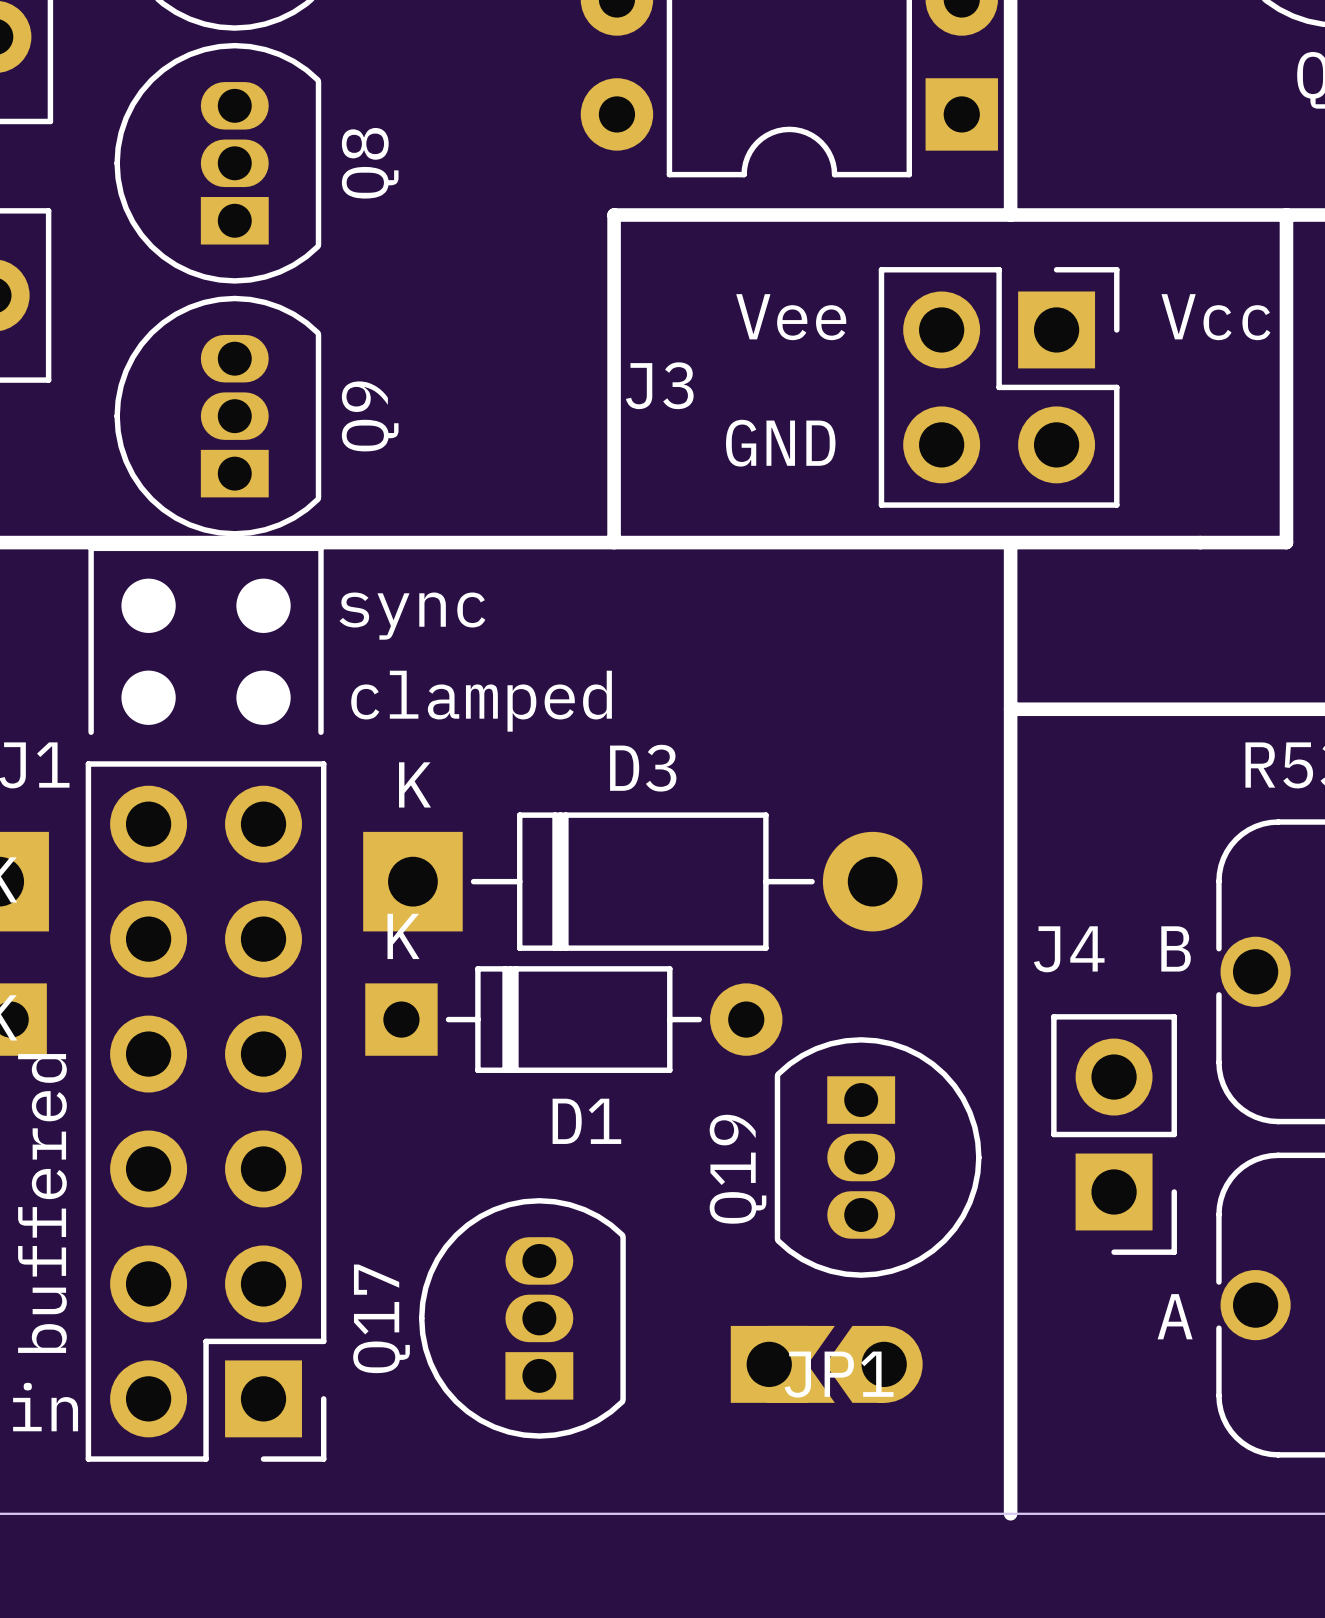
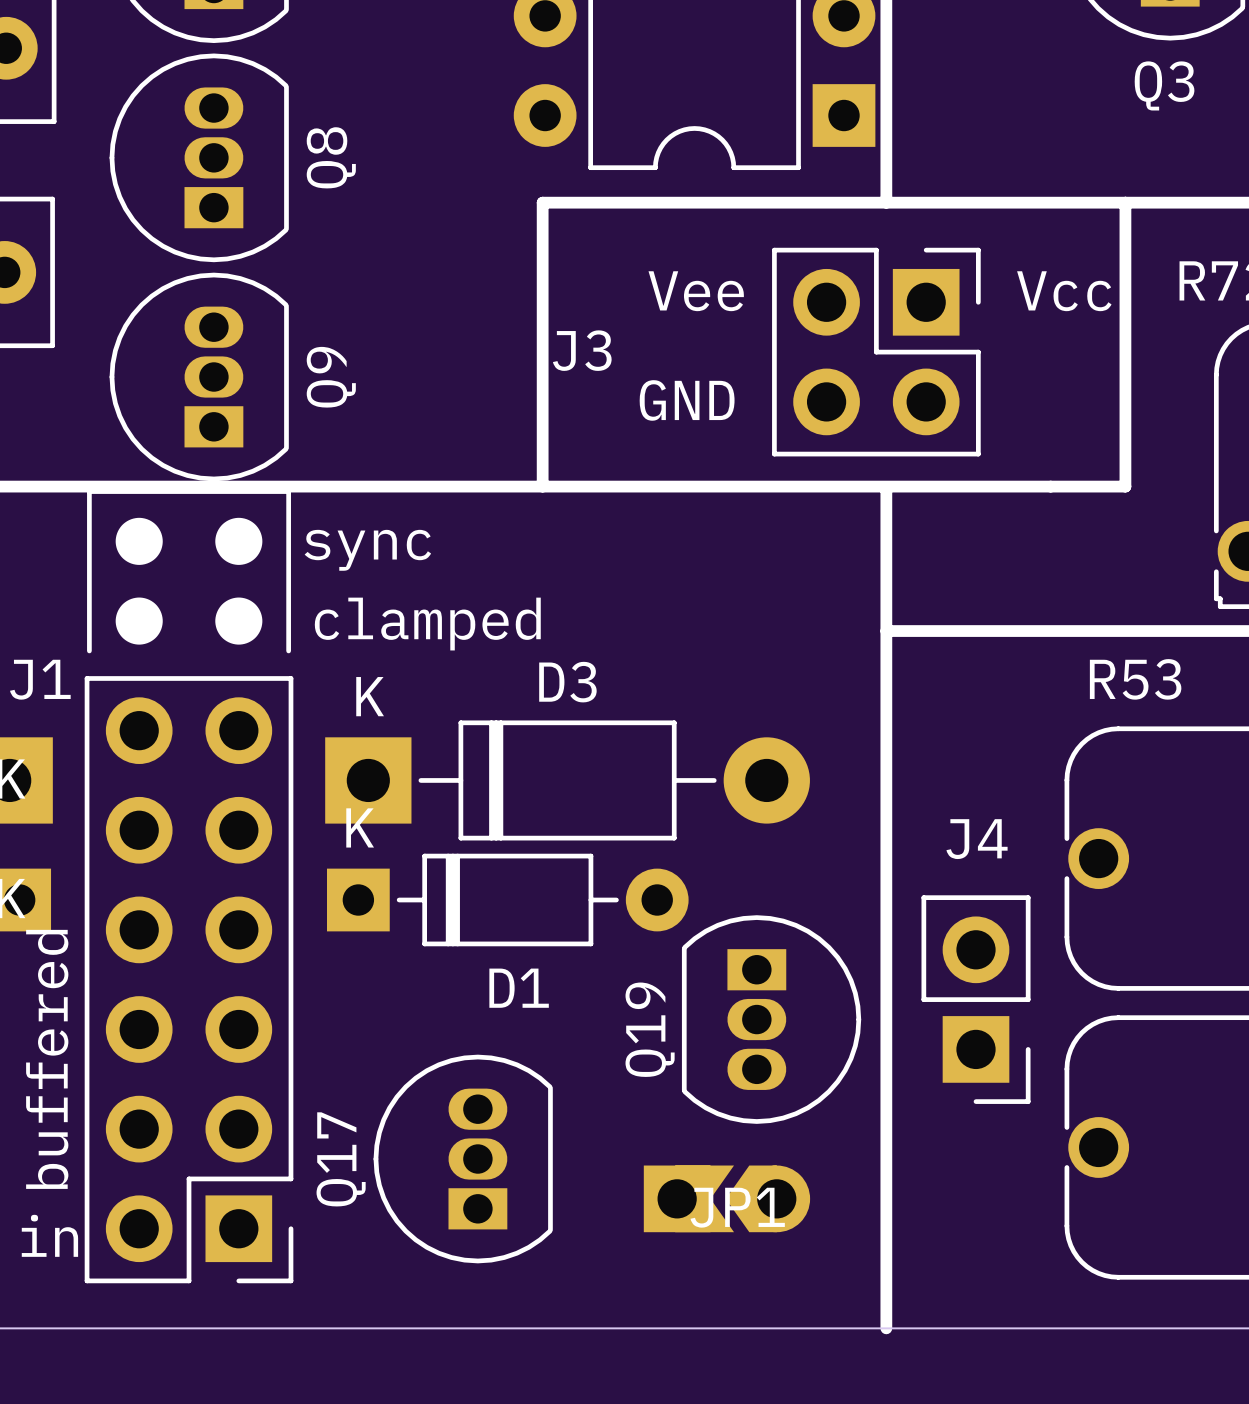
text: B (1176, 948) -> none
J4 name position: J4 (1069, 949) -> J4 (977, 839)
text: A (1175, 1316) -> none

